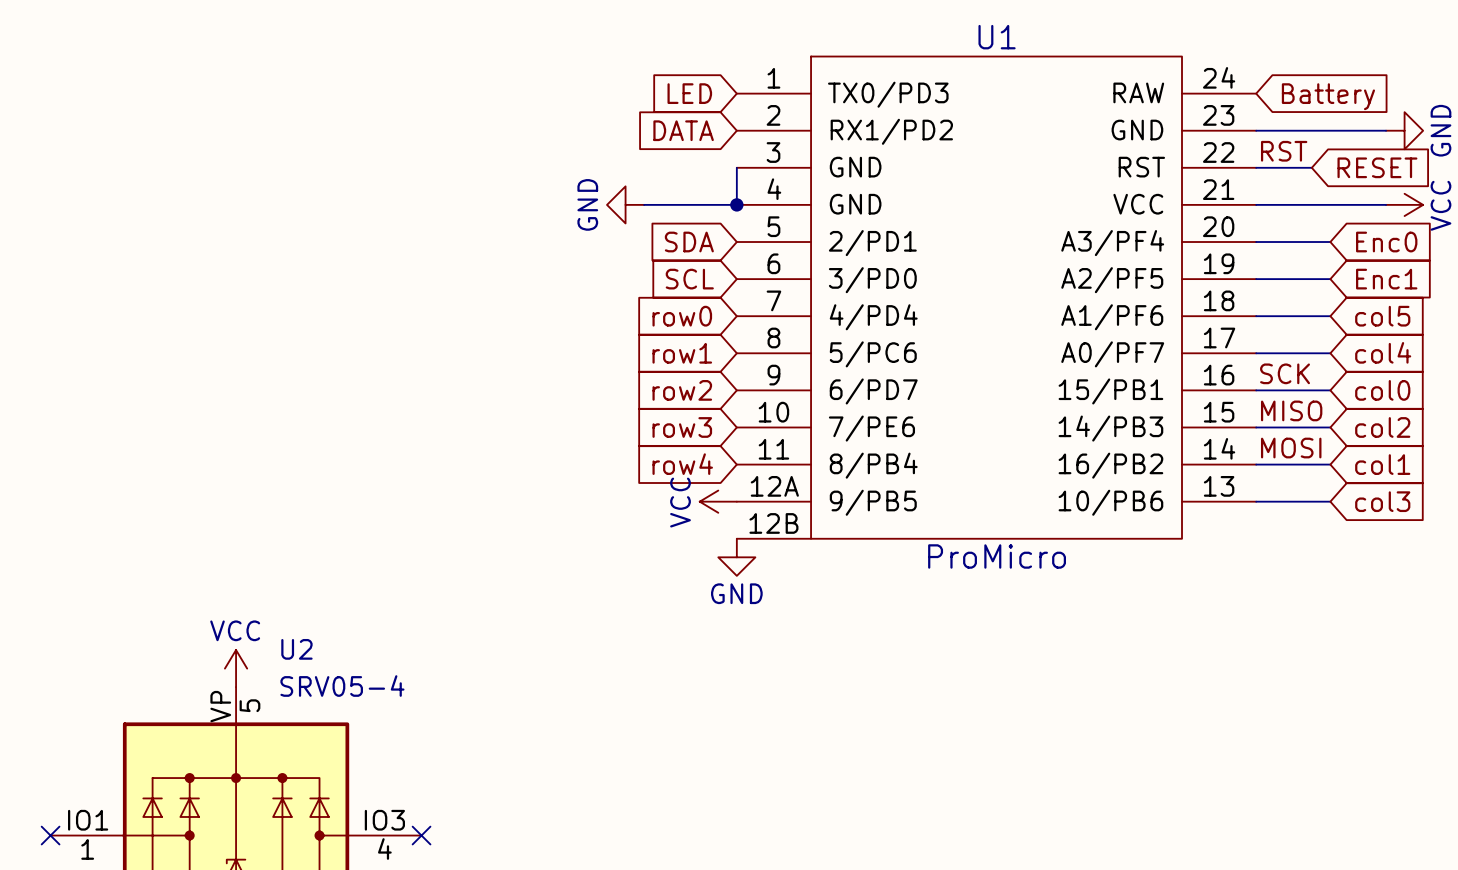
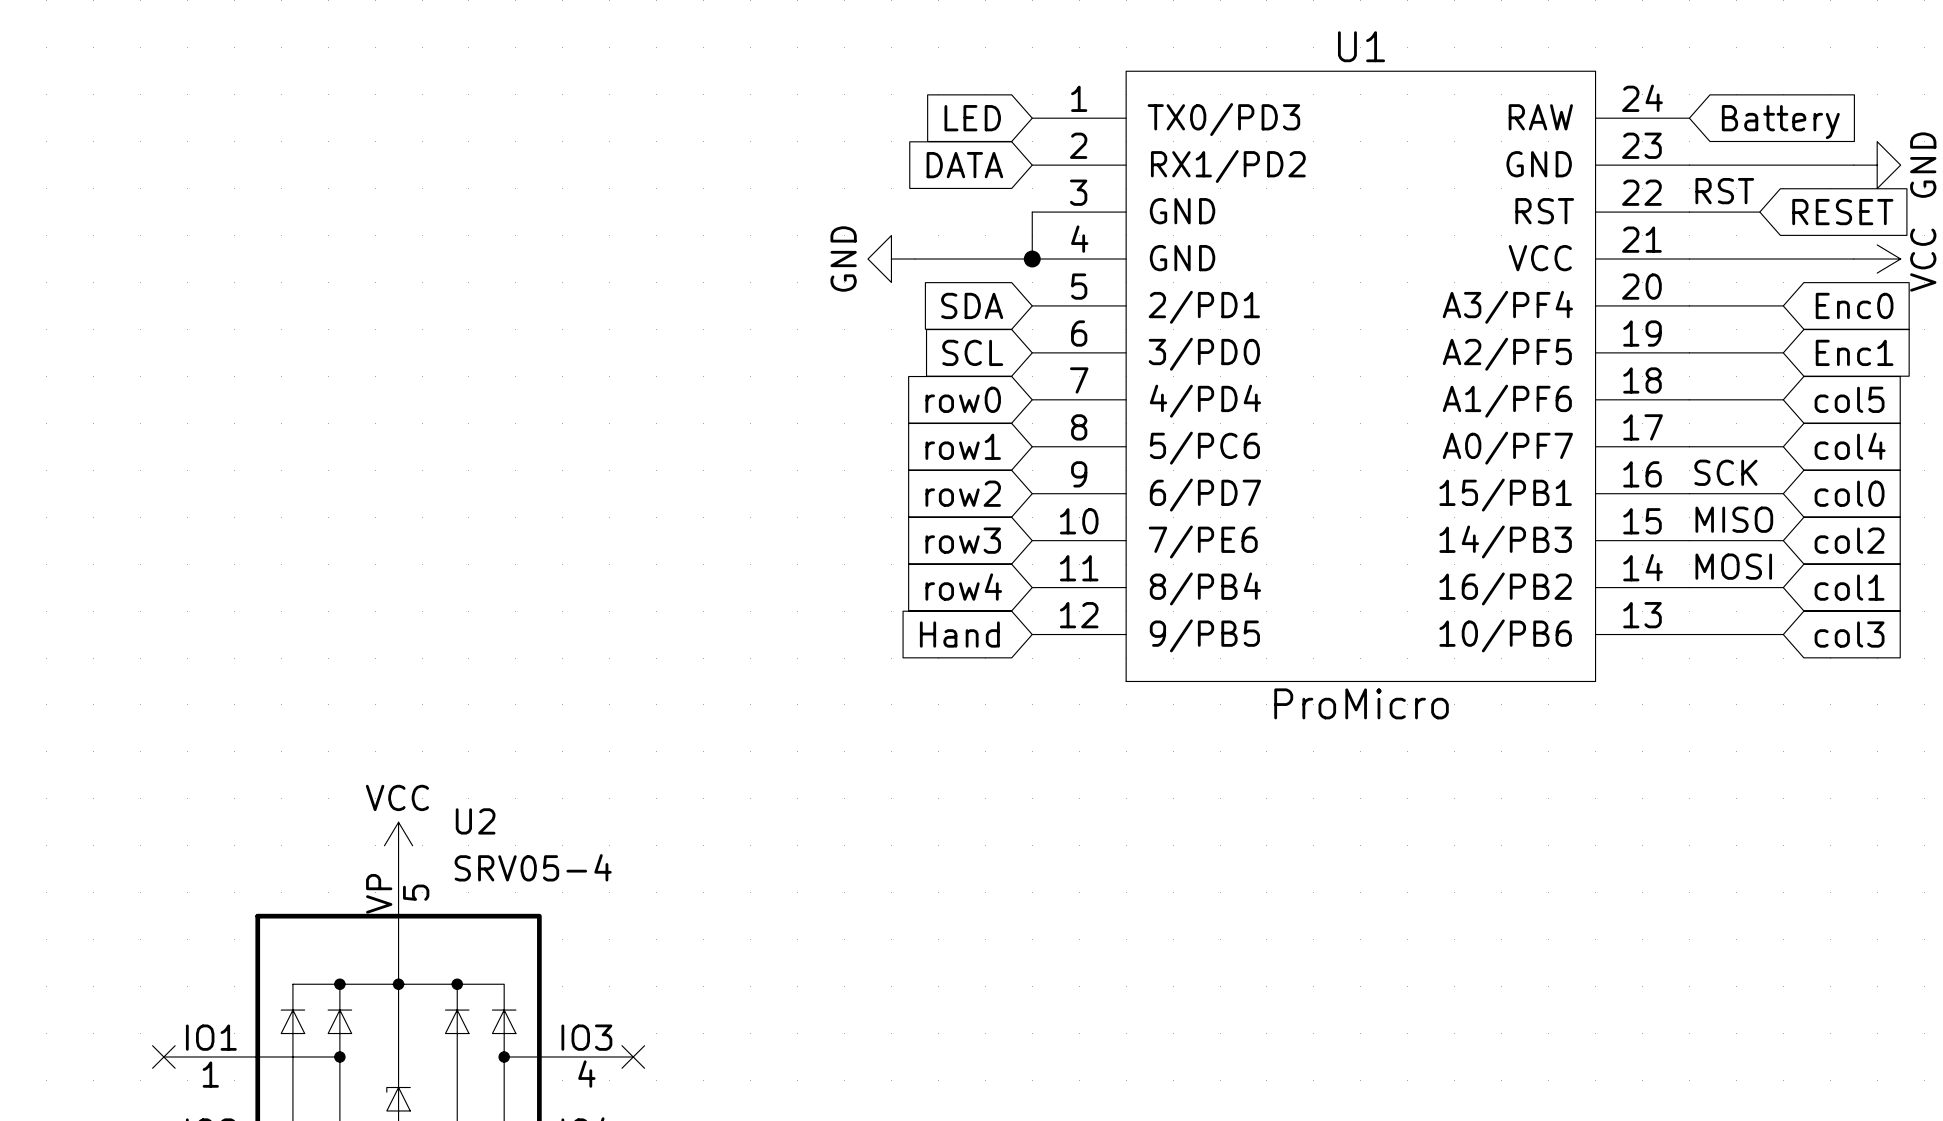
U1 symbol: [736, 56, 1257, 539] -> [1032, 71, 1690, 682]
global label: none -> Hand (959, 634)
power symbol: VCC (718, 501) -> none
power symbol: GND (736, 557) -> none

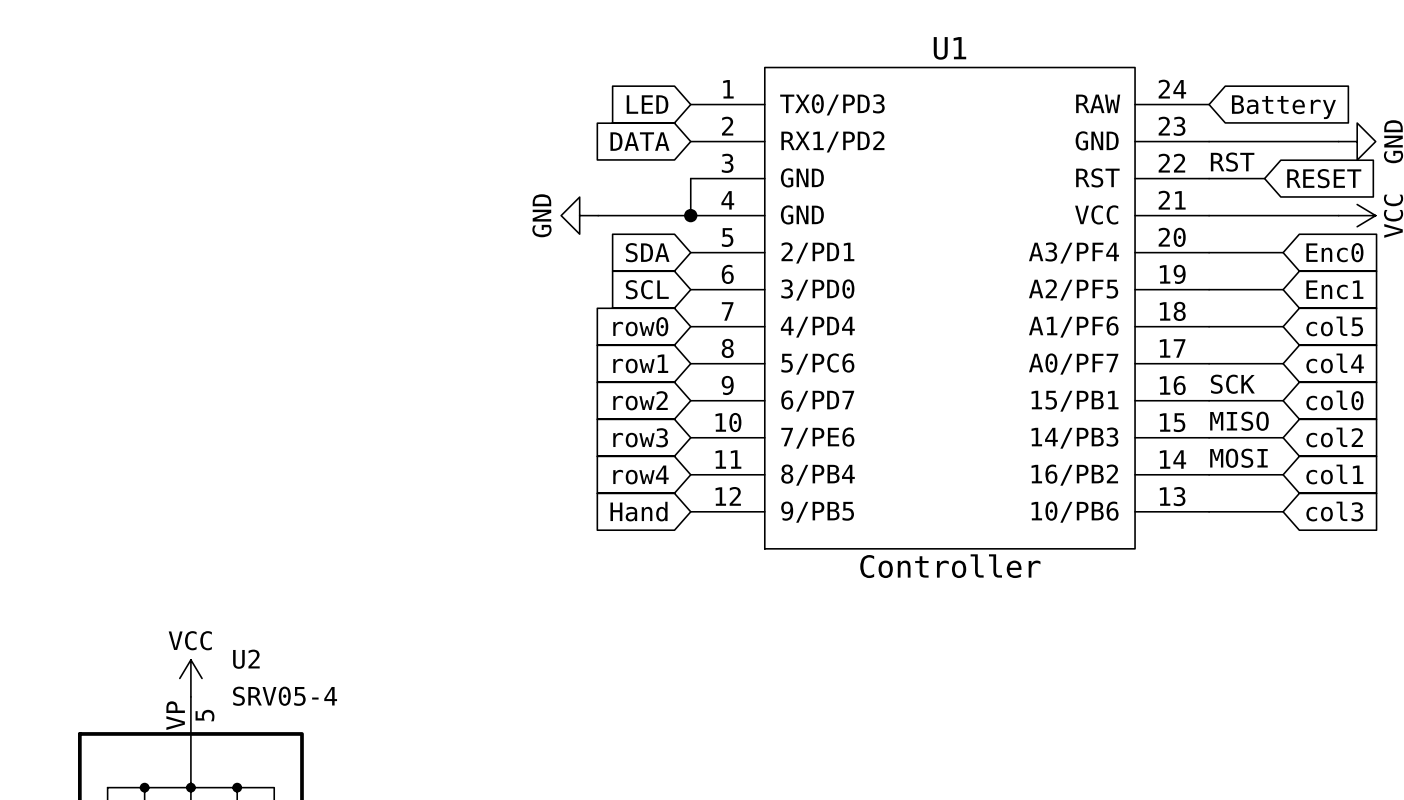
U1 value: ProMicro (1361, 703) -> Controller (950, 566)

